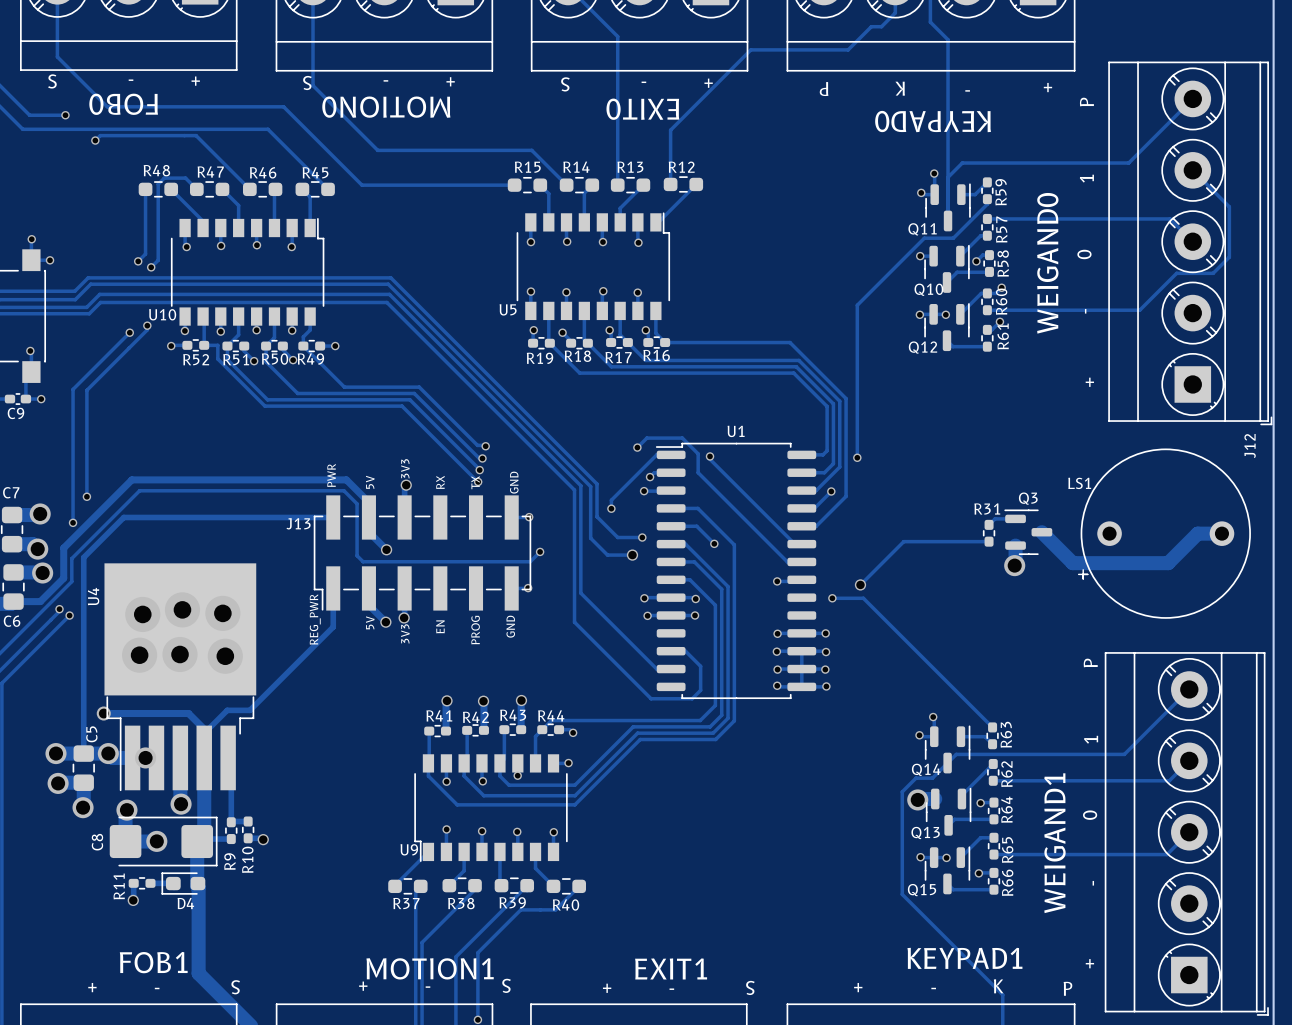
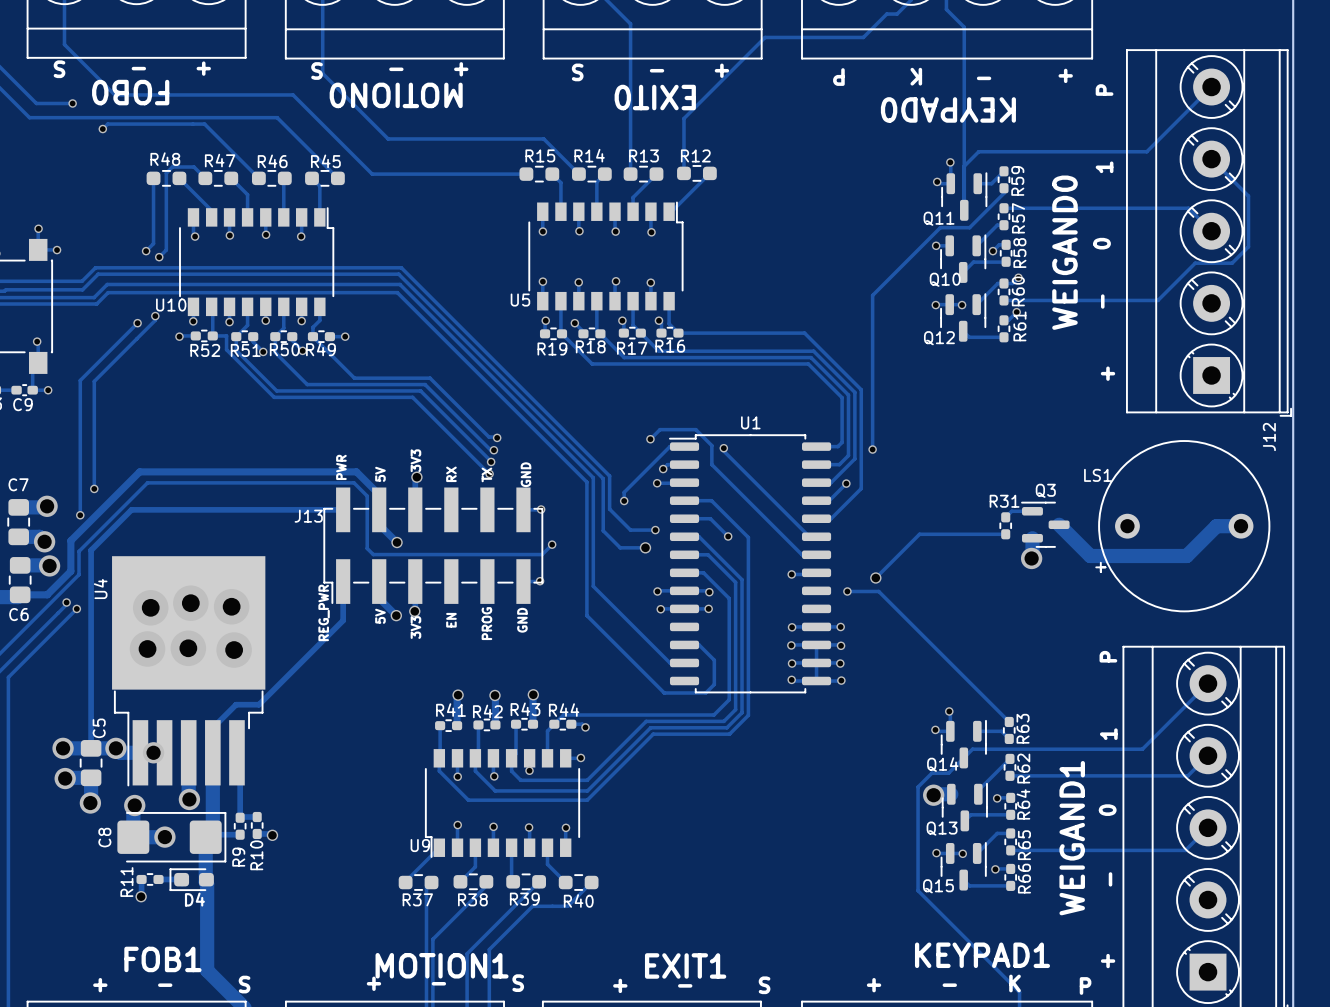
track: (103, 713) (188, 713) (204, 729) (204, 757) -> none
via: (103, 713) -> none

